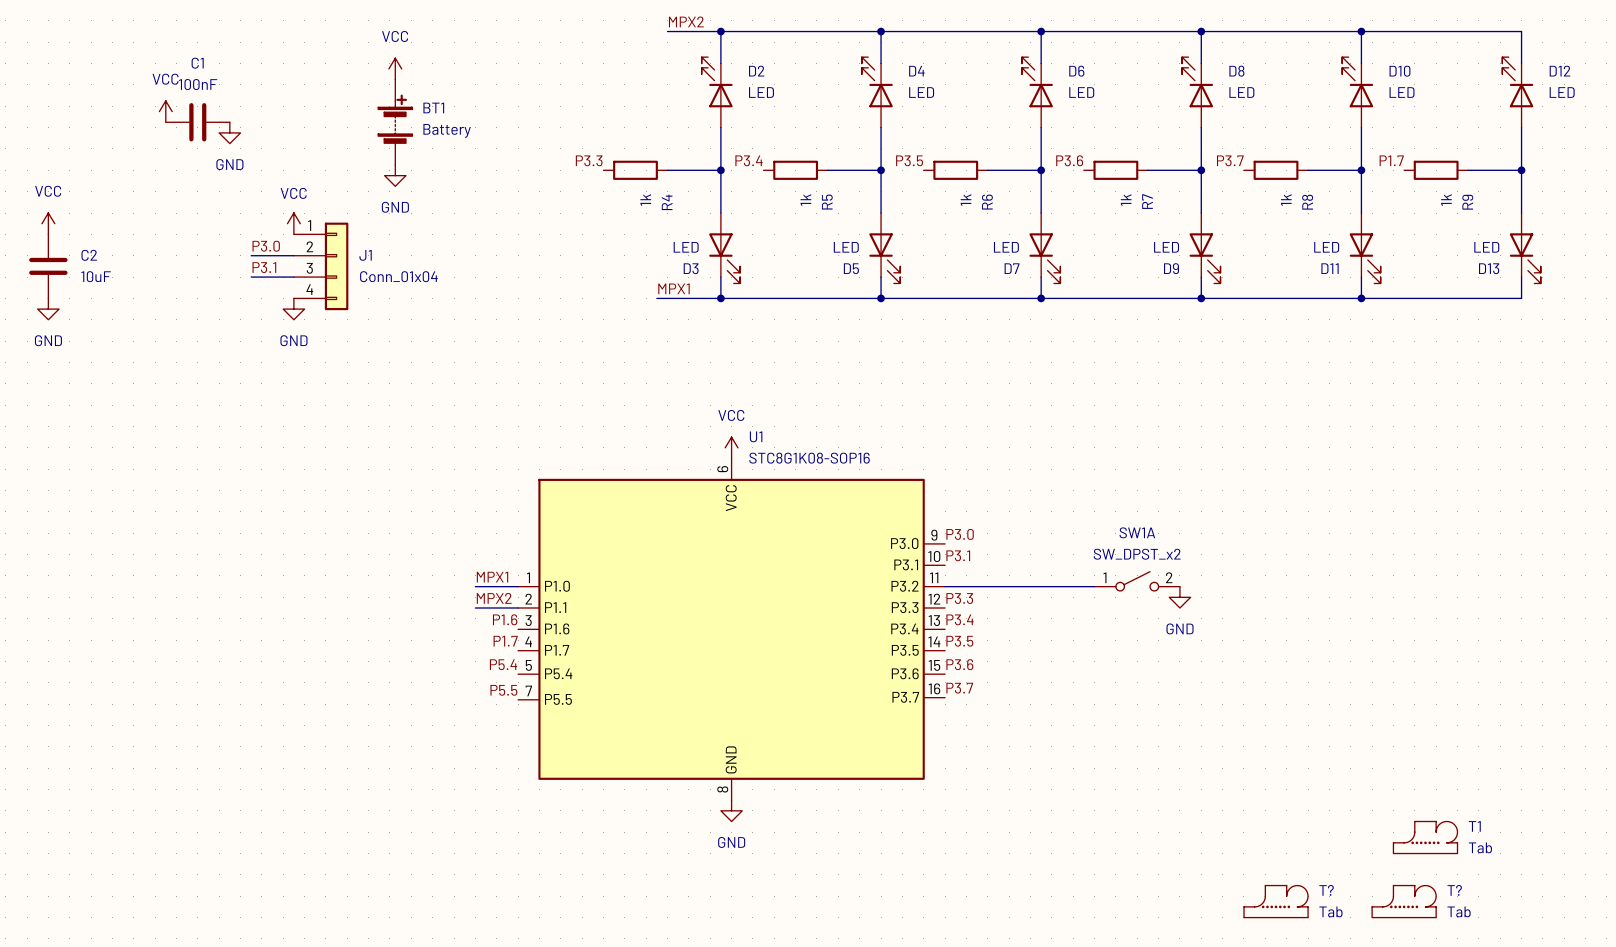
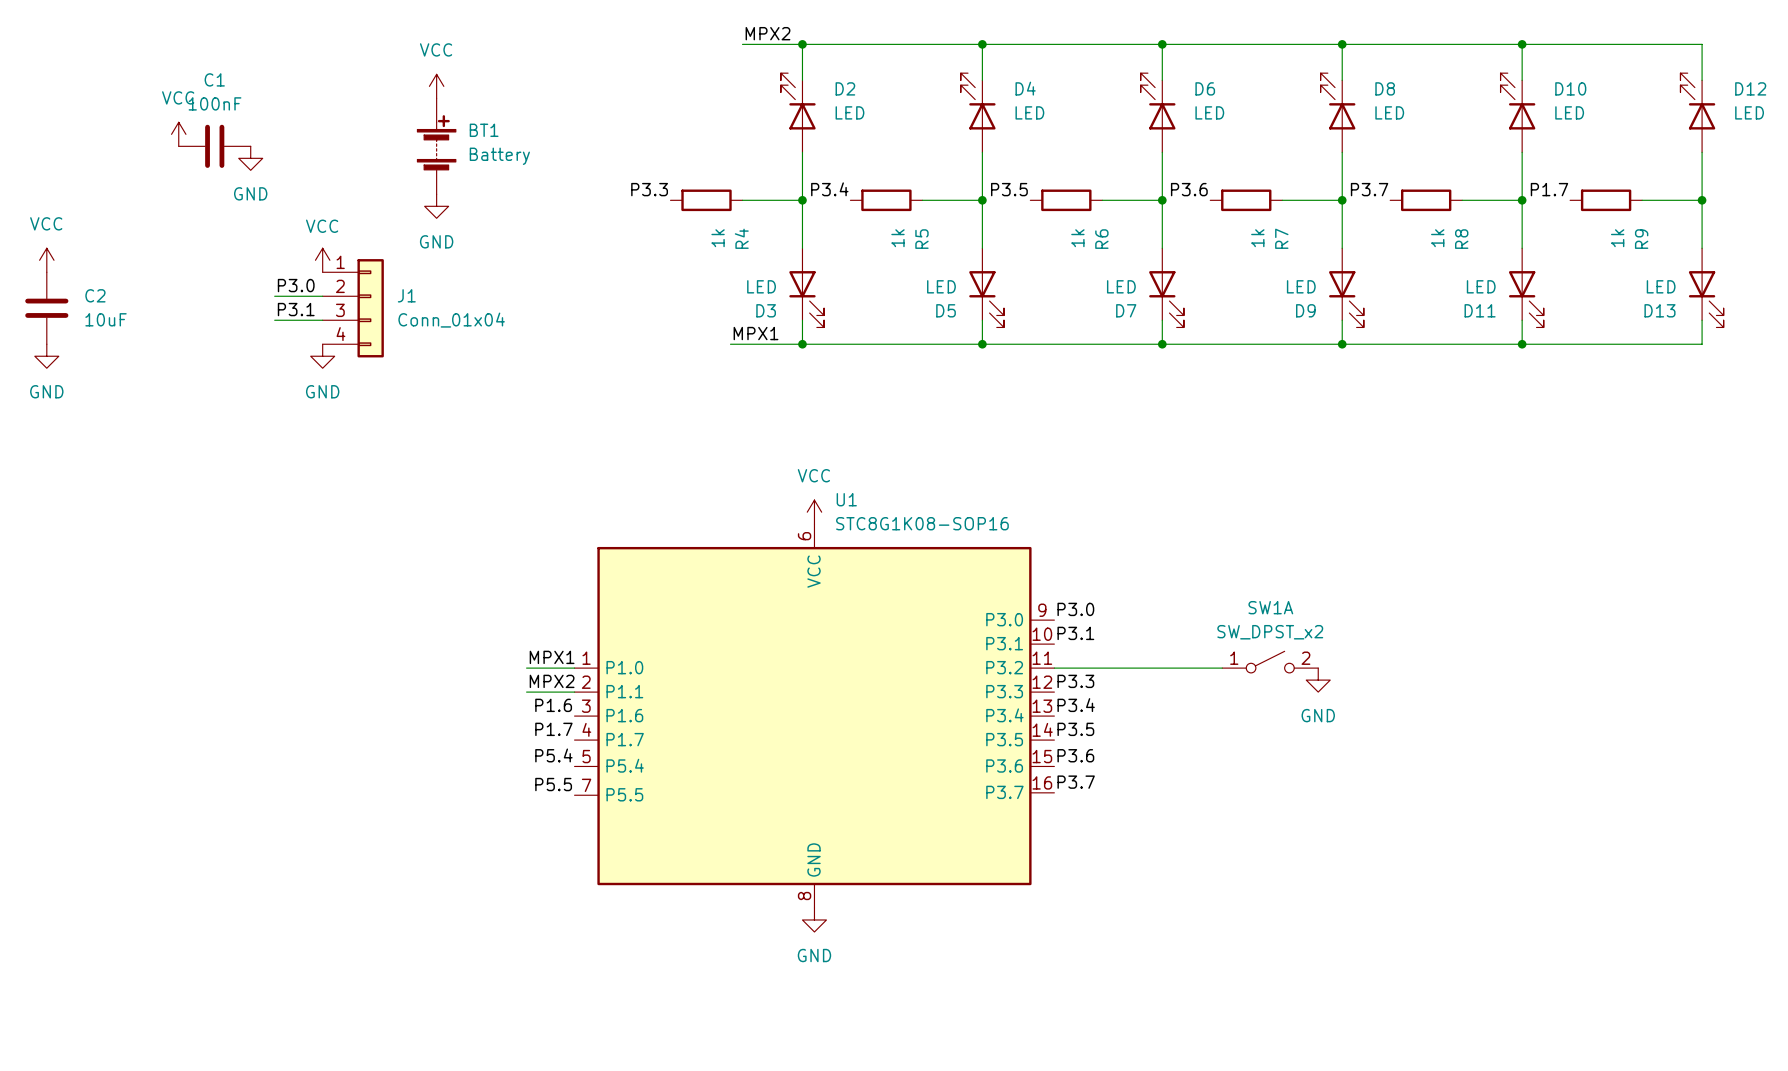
T1: Tab (1425, 837) -> none
T?: Tab (1276, 901) -> none
T?: Tab (1404, 901) -> none

